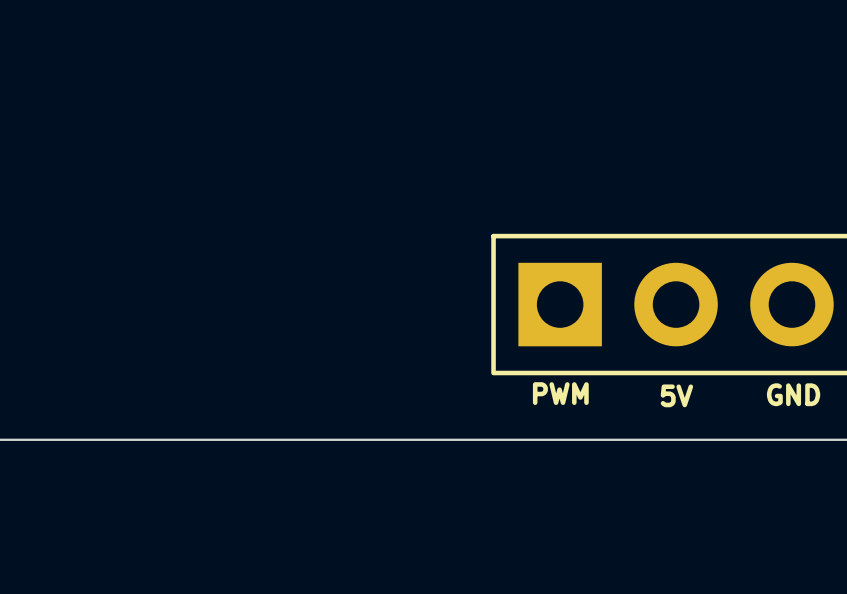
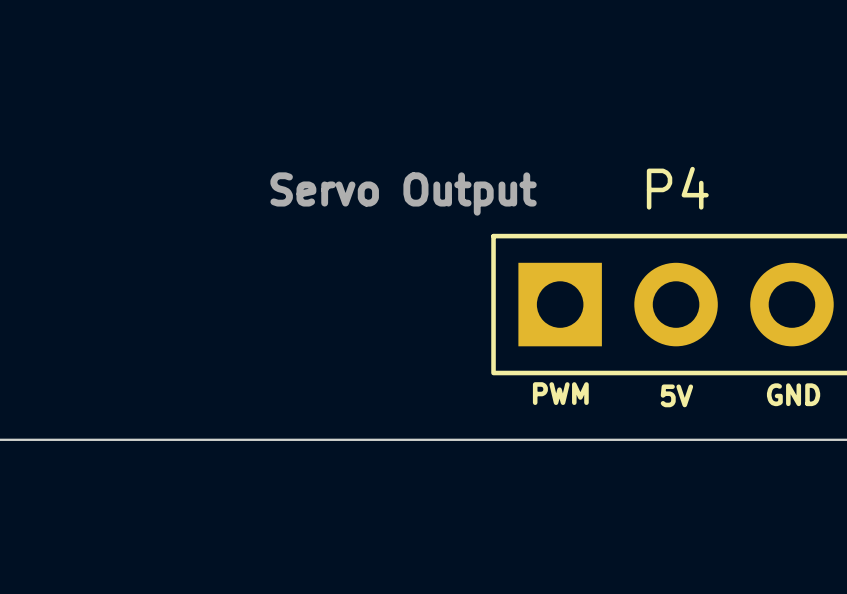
P4 name: none -> P4 (677, 188)
P4 text: none -> Servo Output (403, 194)

